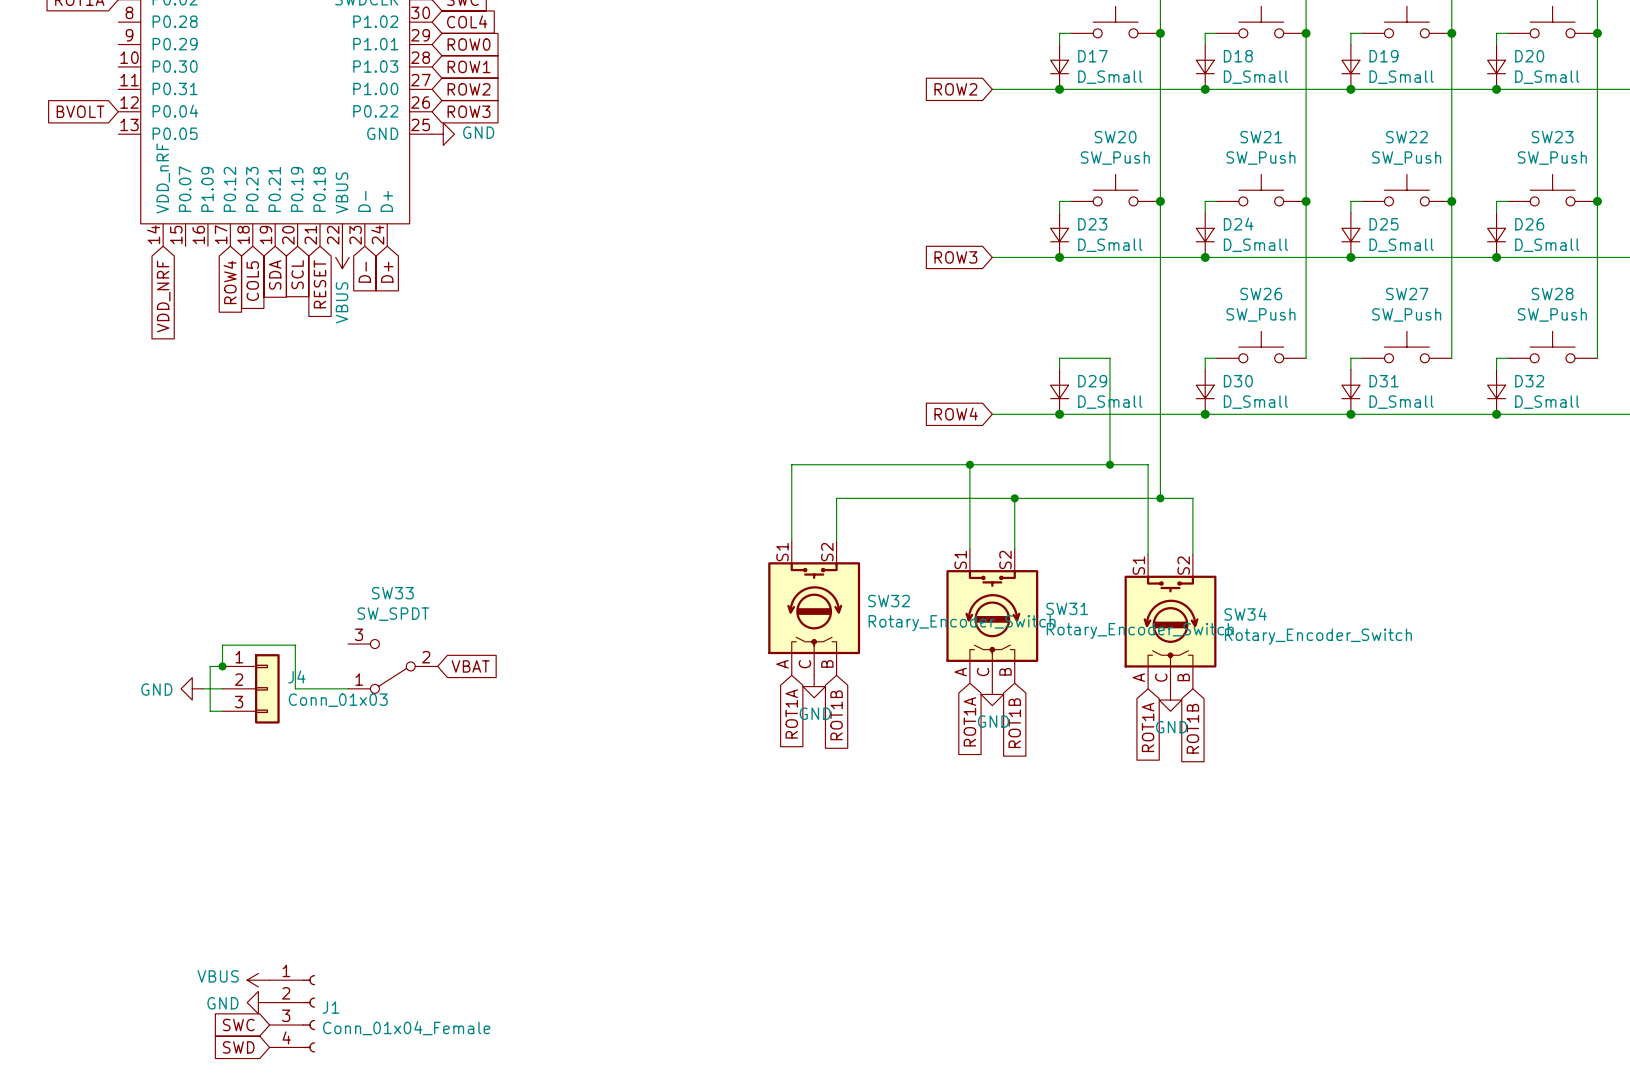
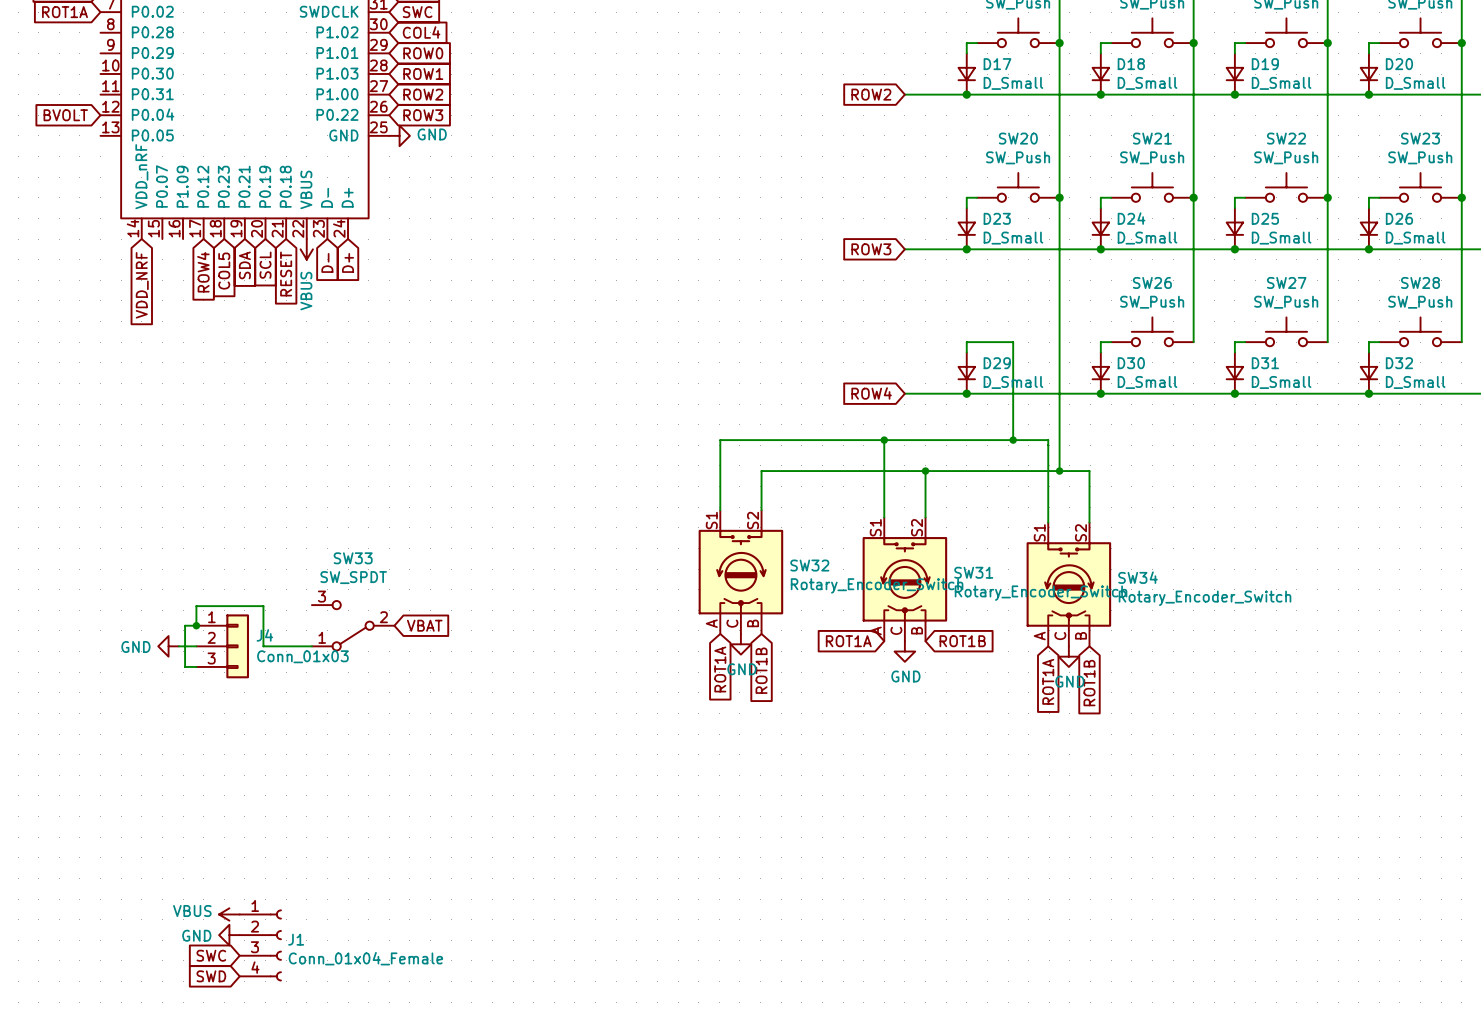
global label rotation: 0° (969, 721) -> 90° clockwise (848, 641)
global label rotation: 0° (1014, 723) -> 90° counterclockwise (962, 641)

